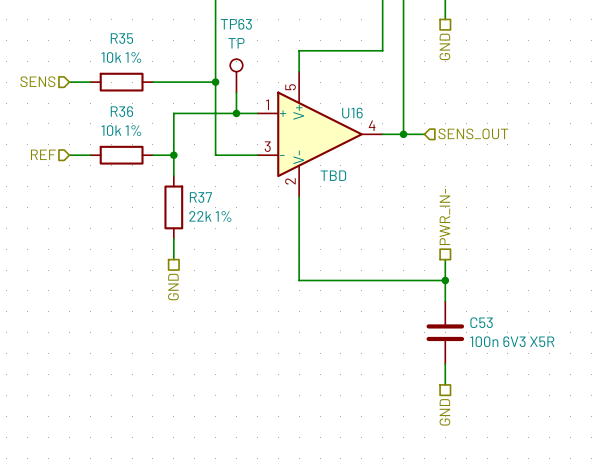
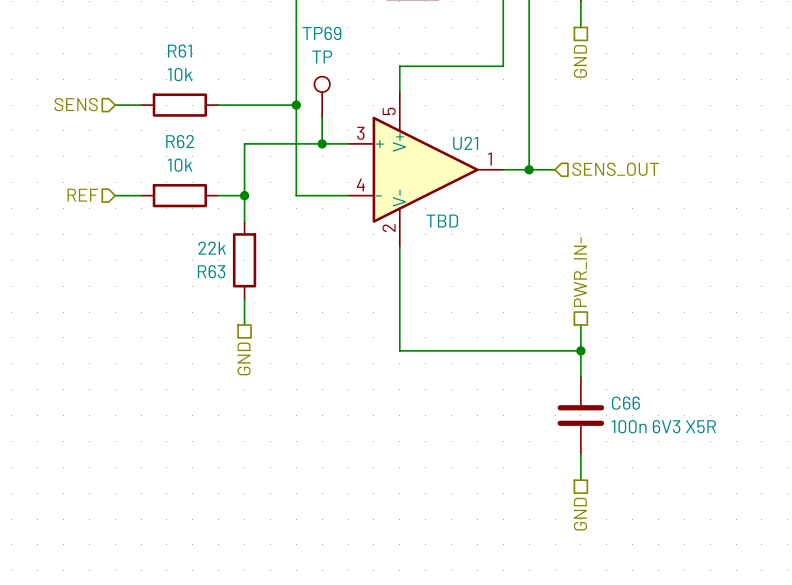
TP63 name: TP63 (236, 24) -> TP69 (321, 33)
R35 name: R35 (121, 38) -> R61 (179, 51)
R35 value: 10k 1% (121, 57) -> 10k (180, 74)
U16 pin number: 1 (267, 104) -> 3 (360, 133)
R36 name: R36 (121, 111) -> R62 (180, 141)
U16 name: U16 (352, 113) -> U21 (465, 143)
U16 pin number: 4 (372, 125) -> 1 (490, 159)
R36 value: 10k 1% (121, 130) -> 10k (180, 165)
U16 pin number: 3 (267, 146) -> 4 (360, 184)
R37 name: R37 (200, 197) -> R63 (211, 271)
R37 value: 22k 1% (210, 216) -> 22k (212, 248)
C53 name: C53 (481, 322) -> C66 (625, 403)

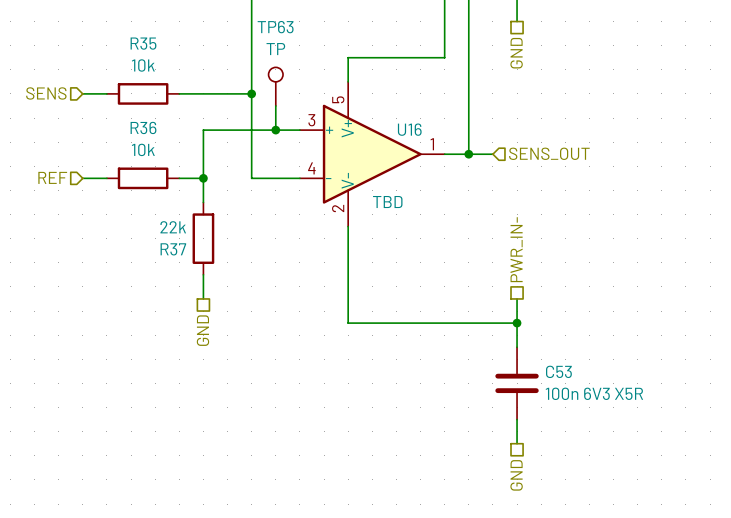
TP69 name: TP69 (321, 33) -> TP63 (275, 27)
R61 name: R61 (179, 51) -> R35 (143, 43)
R62 name: R62 (180, 141) -> R36 (143, 127)
U21 name: U21 (465, 143) -> U16 (409, 129)
R63 name: R63 (211, 271) -> R37 (173, 249)
C66 name: C66 (625, 403) -> C53 (558, 371)

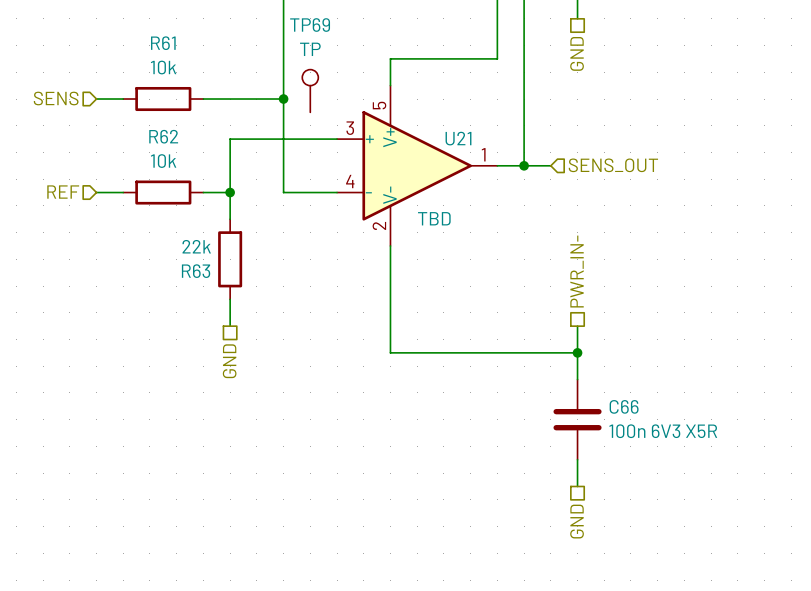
TP63 name: TP63 (275, 27) -> TP69 (310, 25)
R35 name: R35 (143, 43) -> R61 (163, 43)
wire: (275, 105) (275, 130) -> none
R36 name: R36 (143, 127) -> R62 (163, 136)
U16 name: U16 (409, 129) -> U21 (458, 138)
junction: (275, 130) -> none
R37 name: R37 (173, 249) -> R63 (196, 271)
C53 name: C53 (558, 371) -> C66 (624, 406)

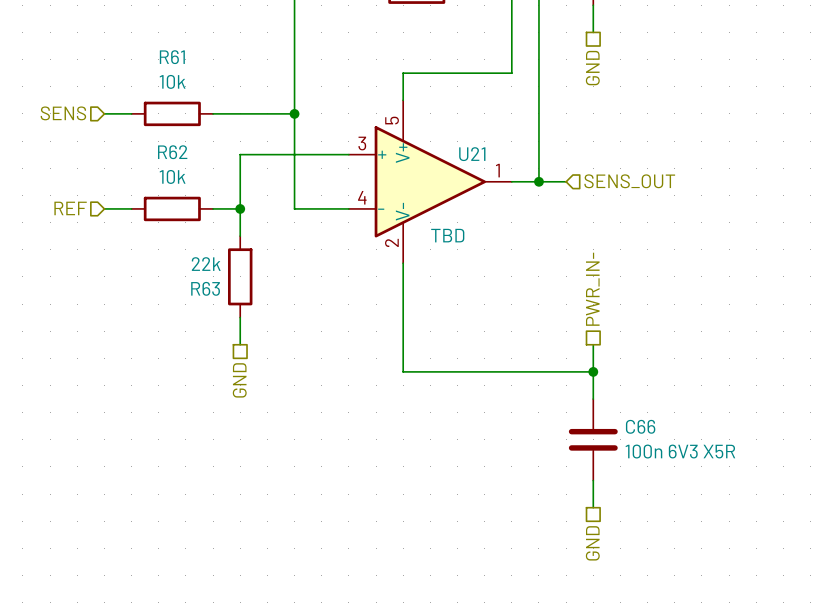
TP69: TP (310, 90) -> none

